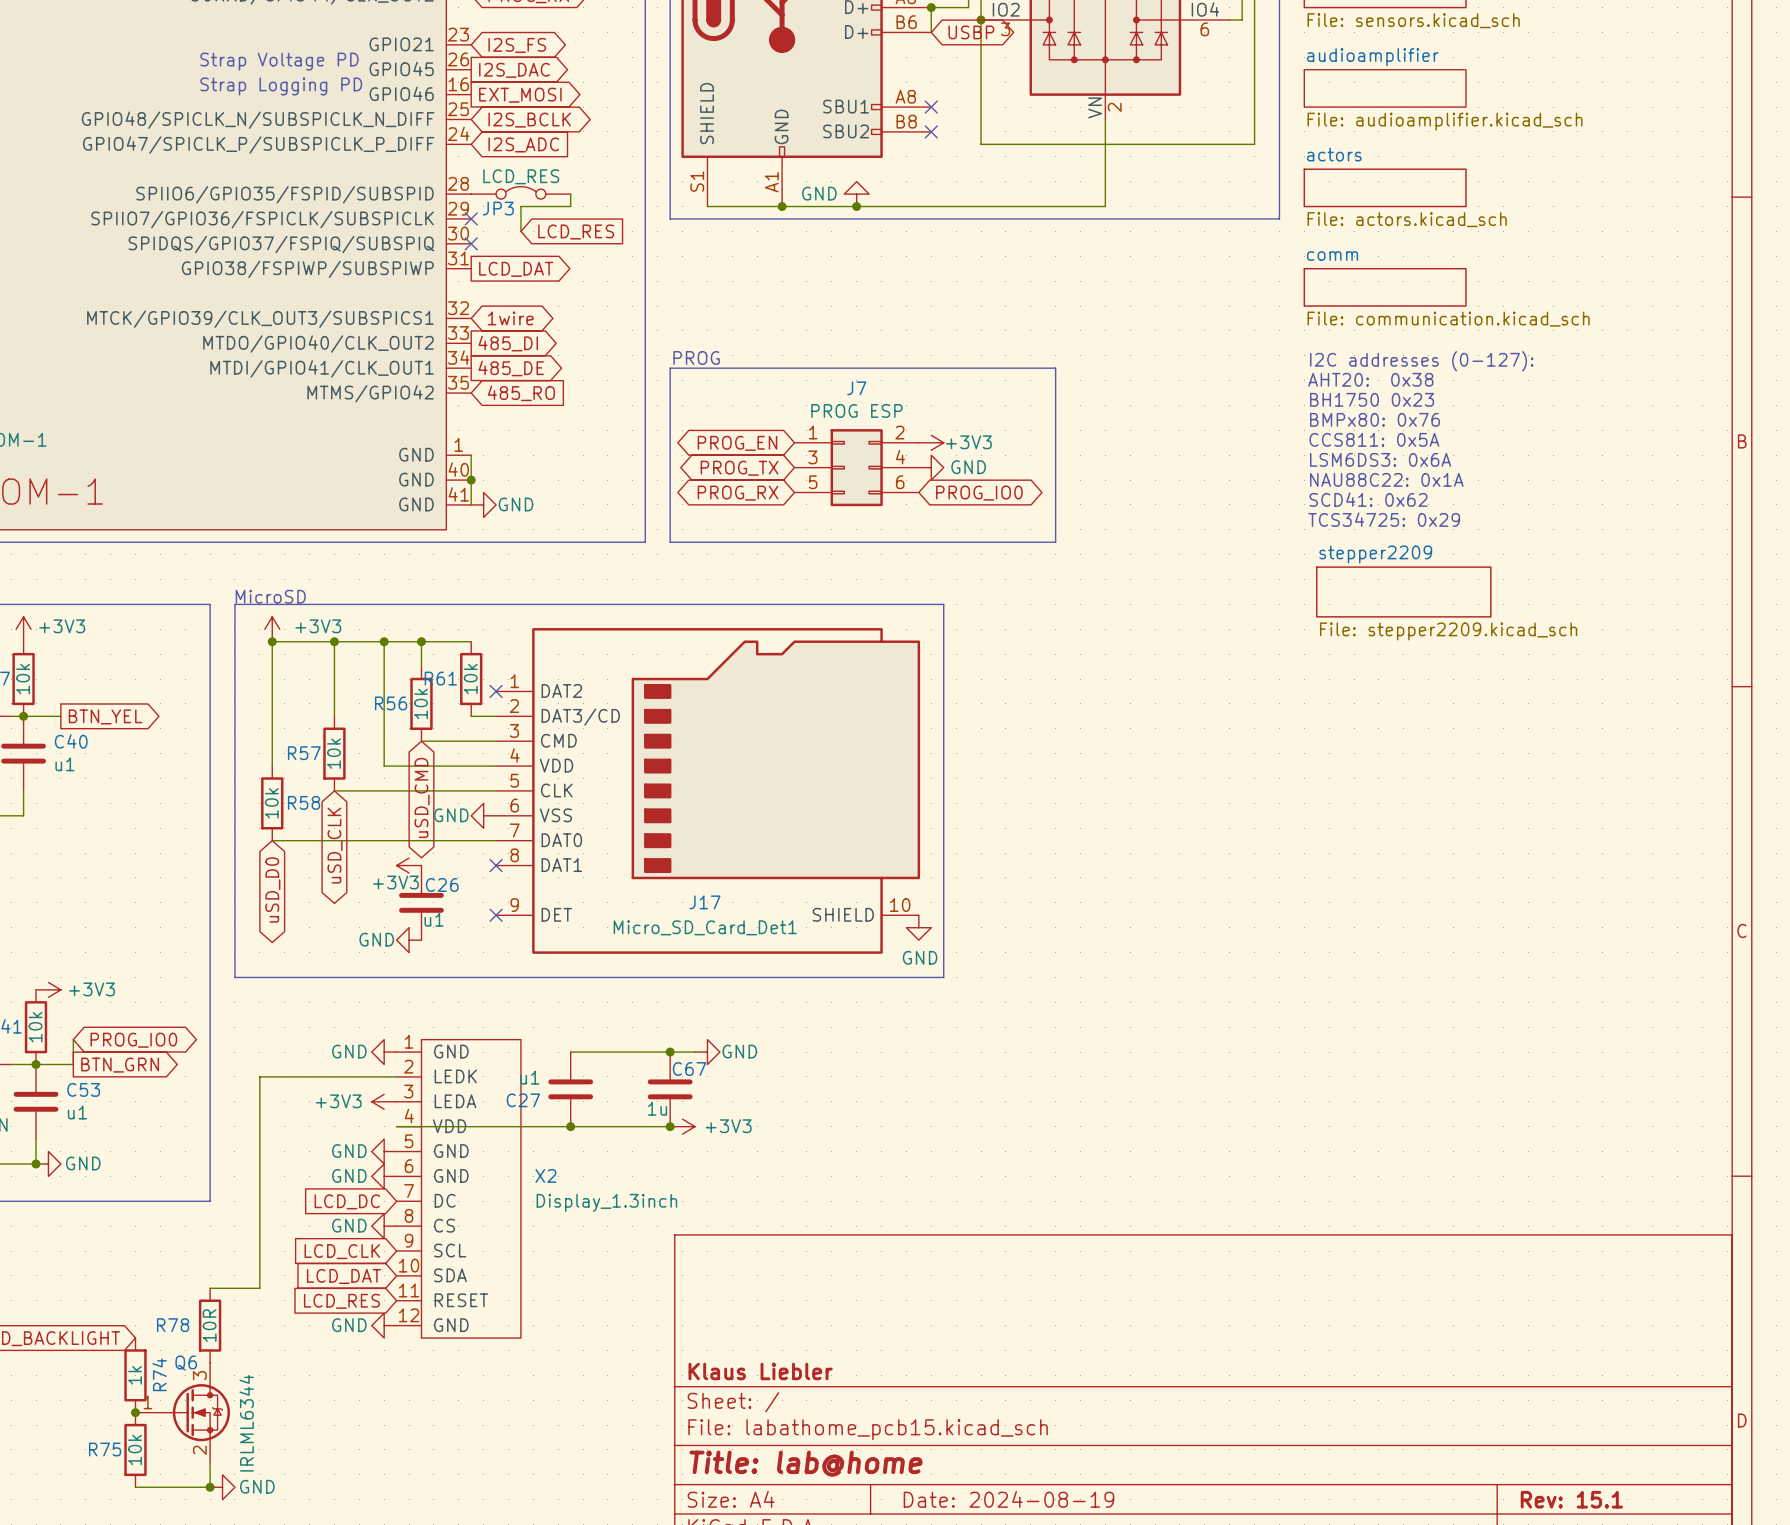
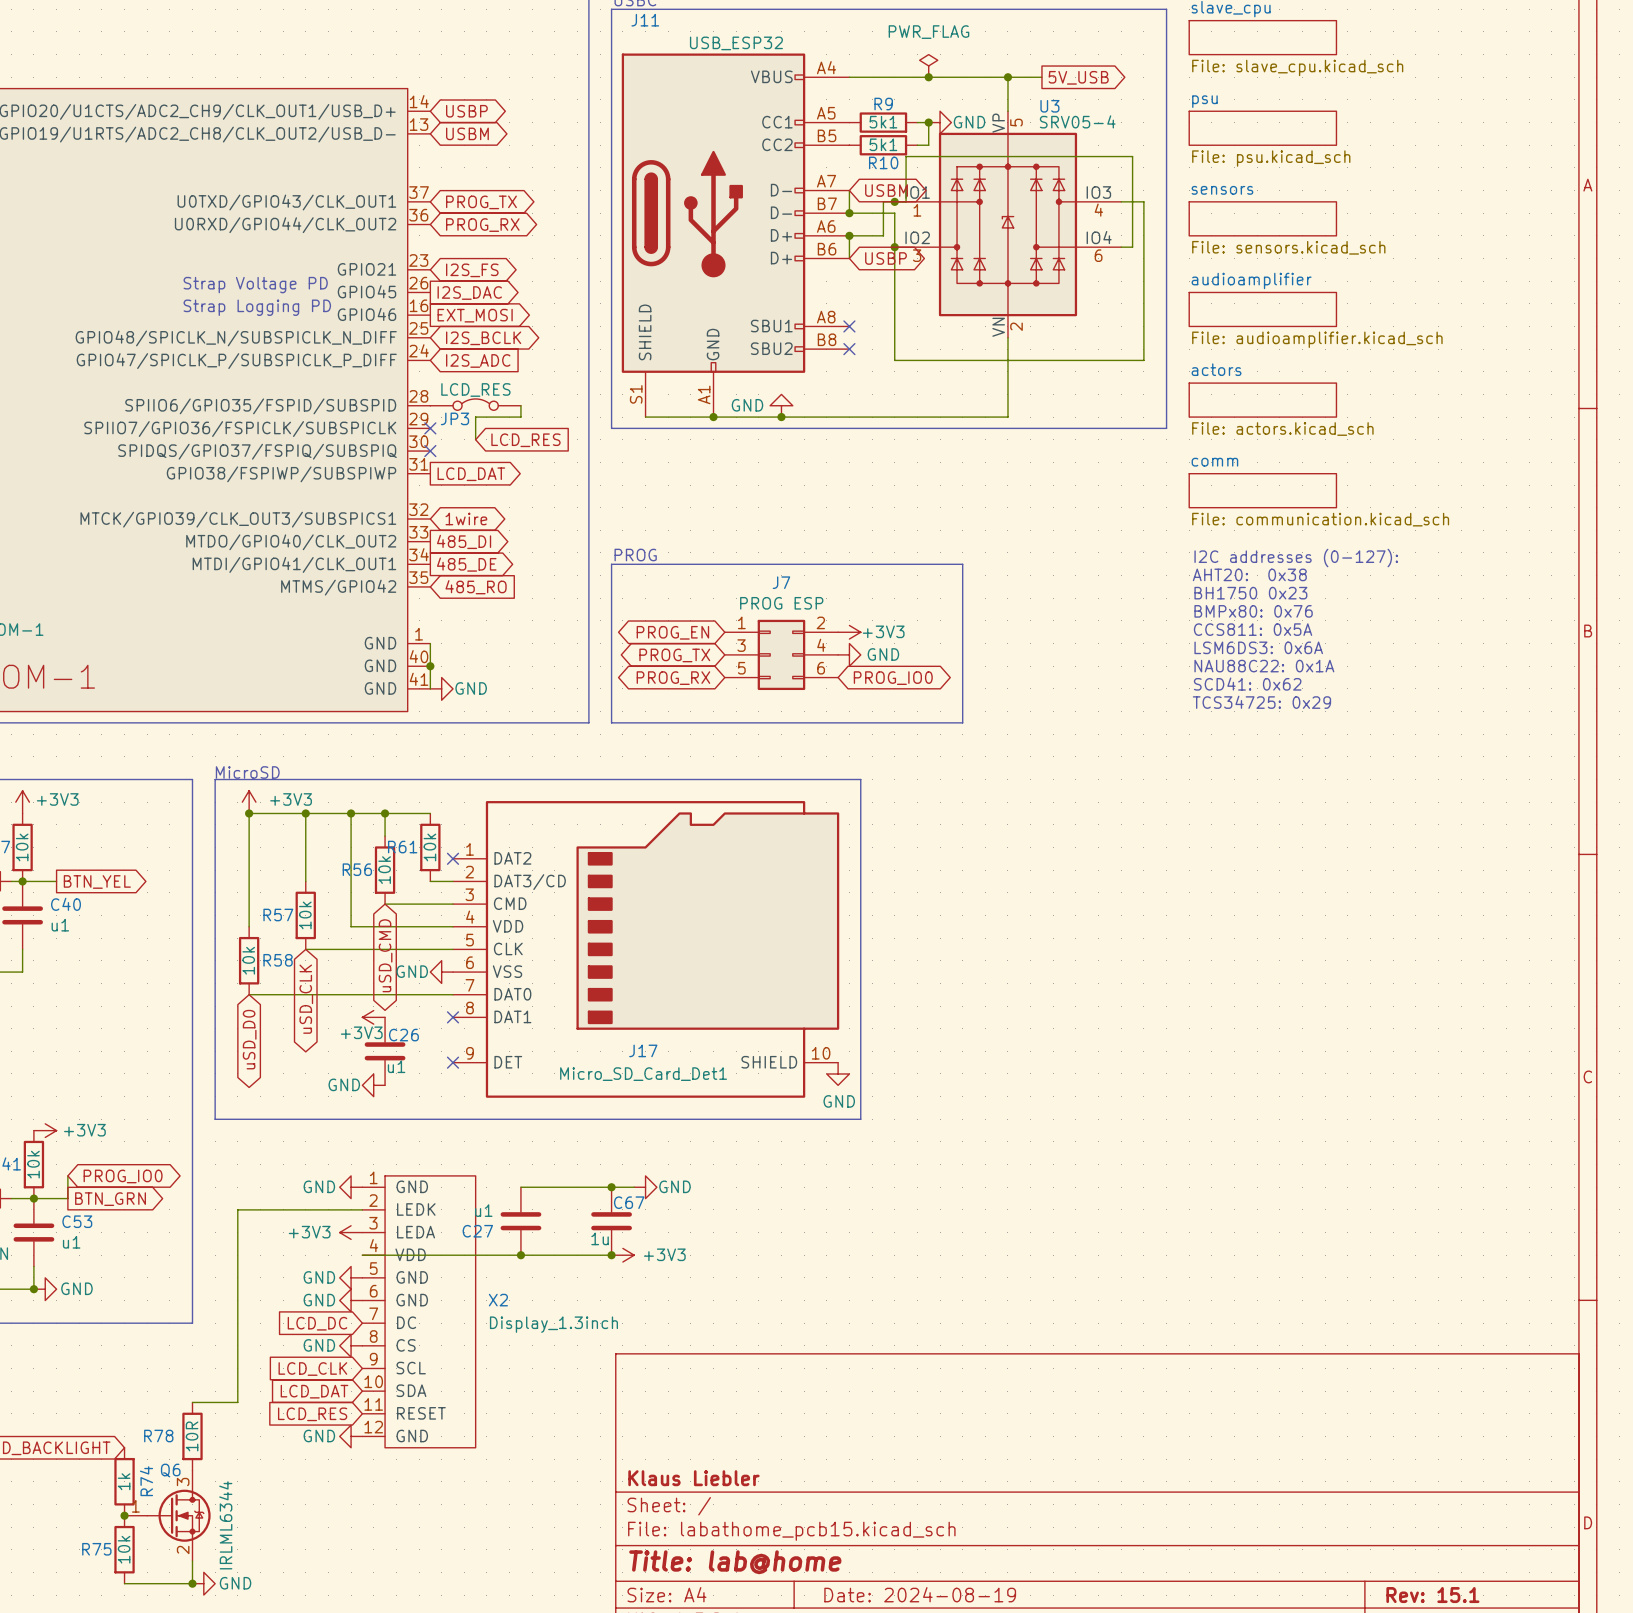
sheet stepper2209: File: stepper2209.kicad_sch (1403, 591) -> none

